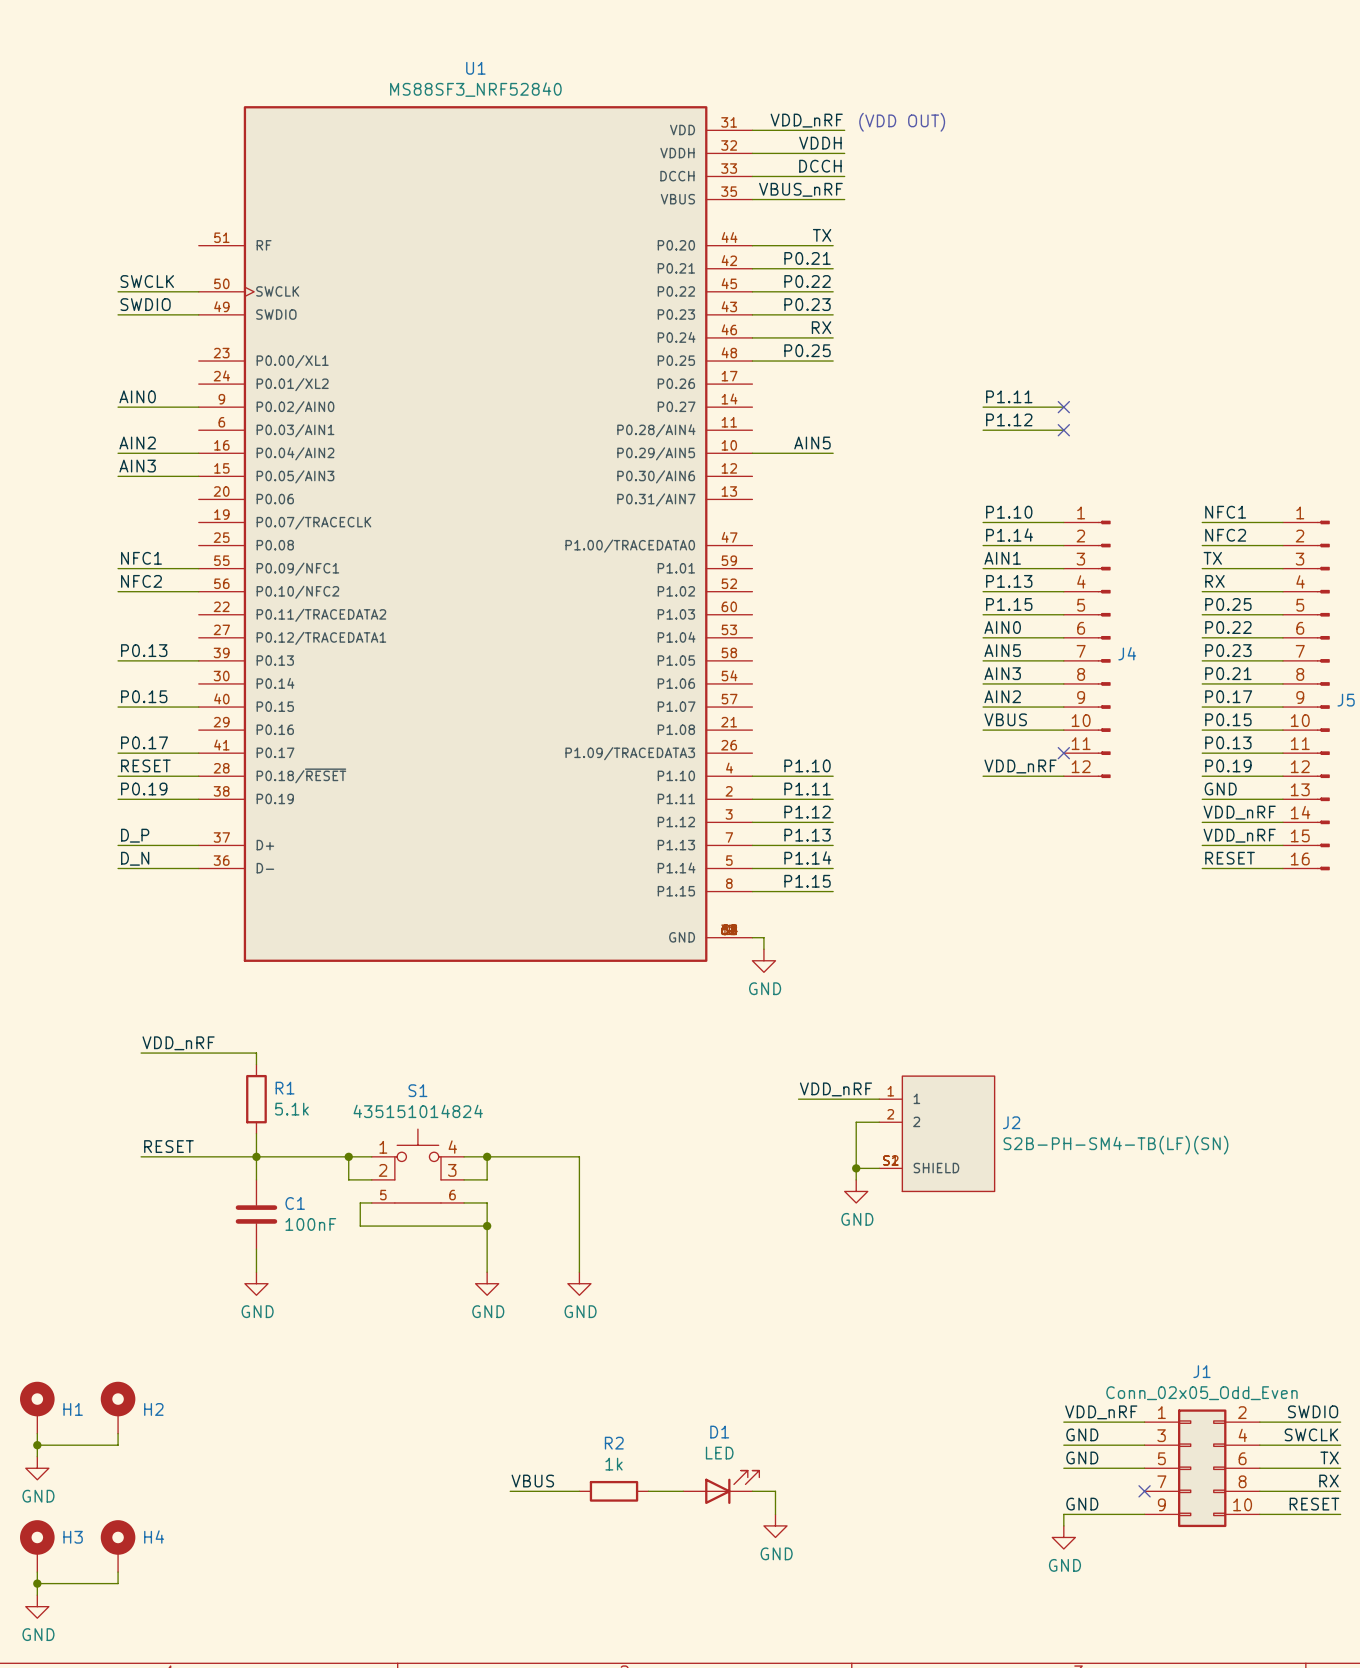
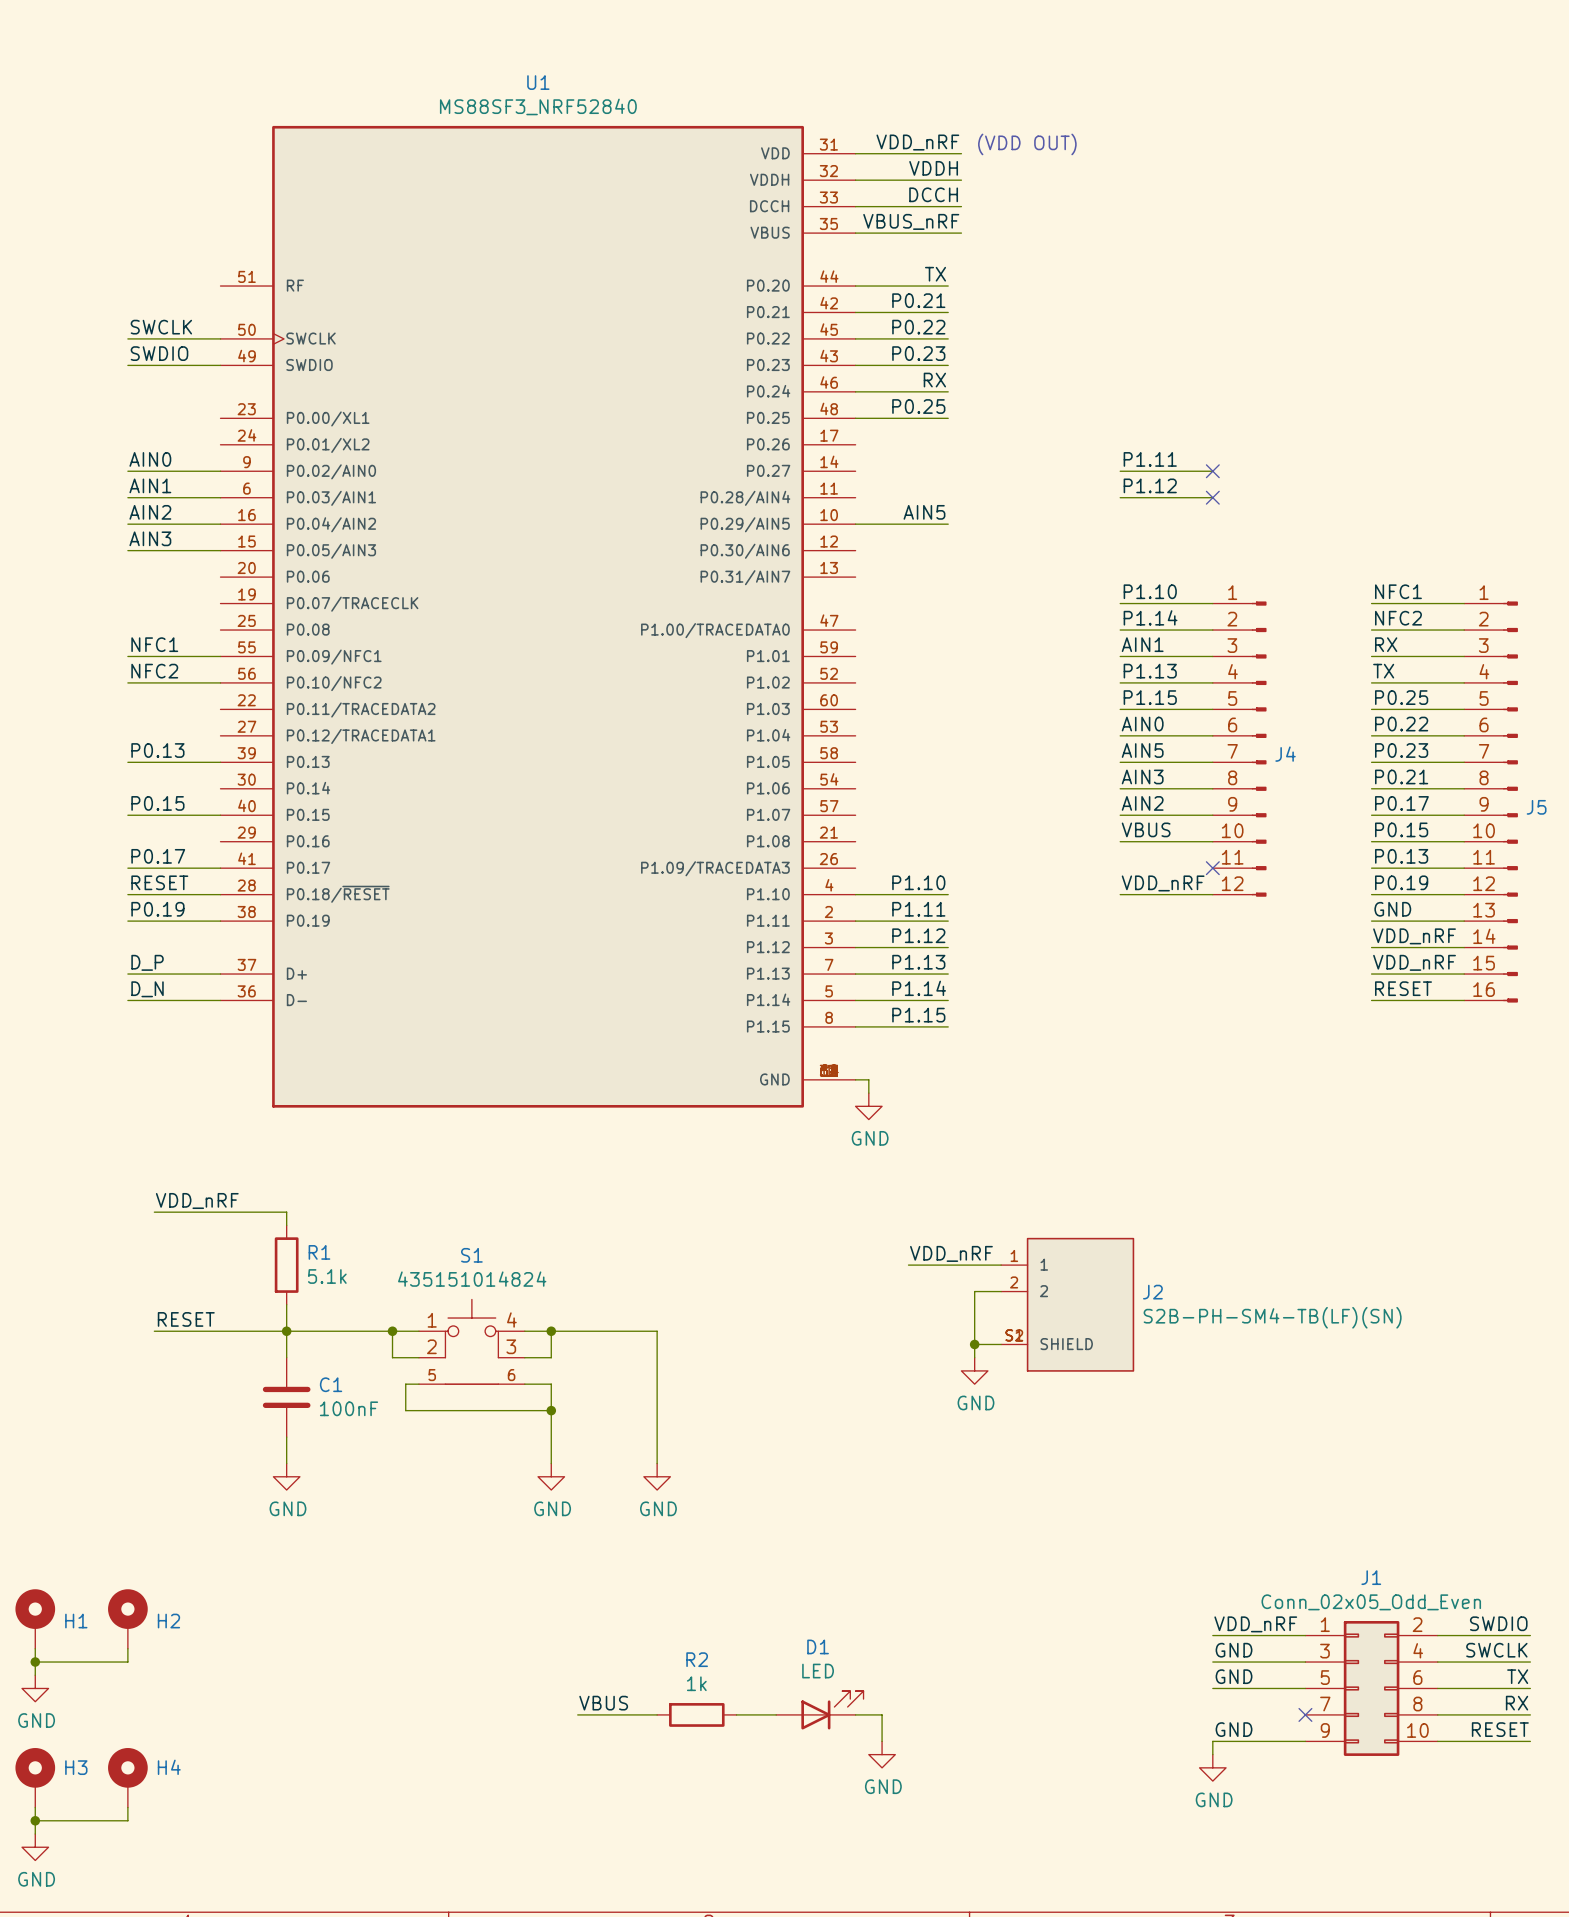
label: none -> AIN1 (150, 485)
wire: none -> (127, 497) (220, 497)
label: TX (1212, 558) -> RX (1386, 644)
label: RX (1214, 581) -> TX (1383, 671)

